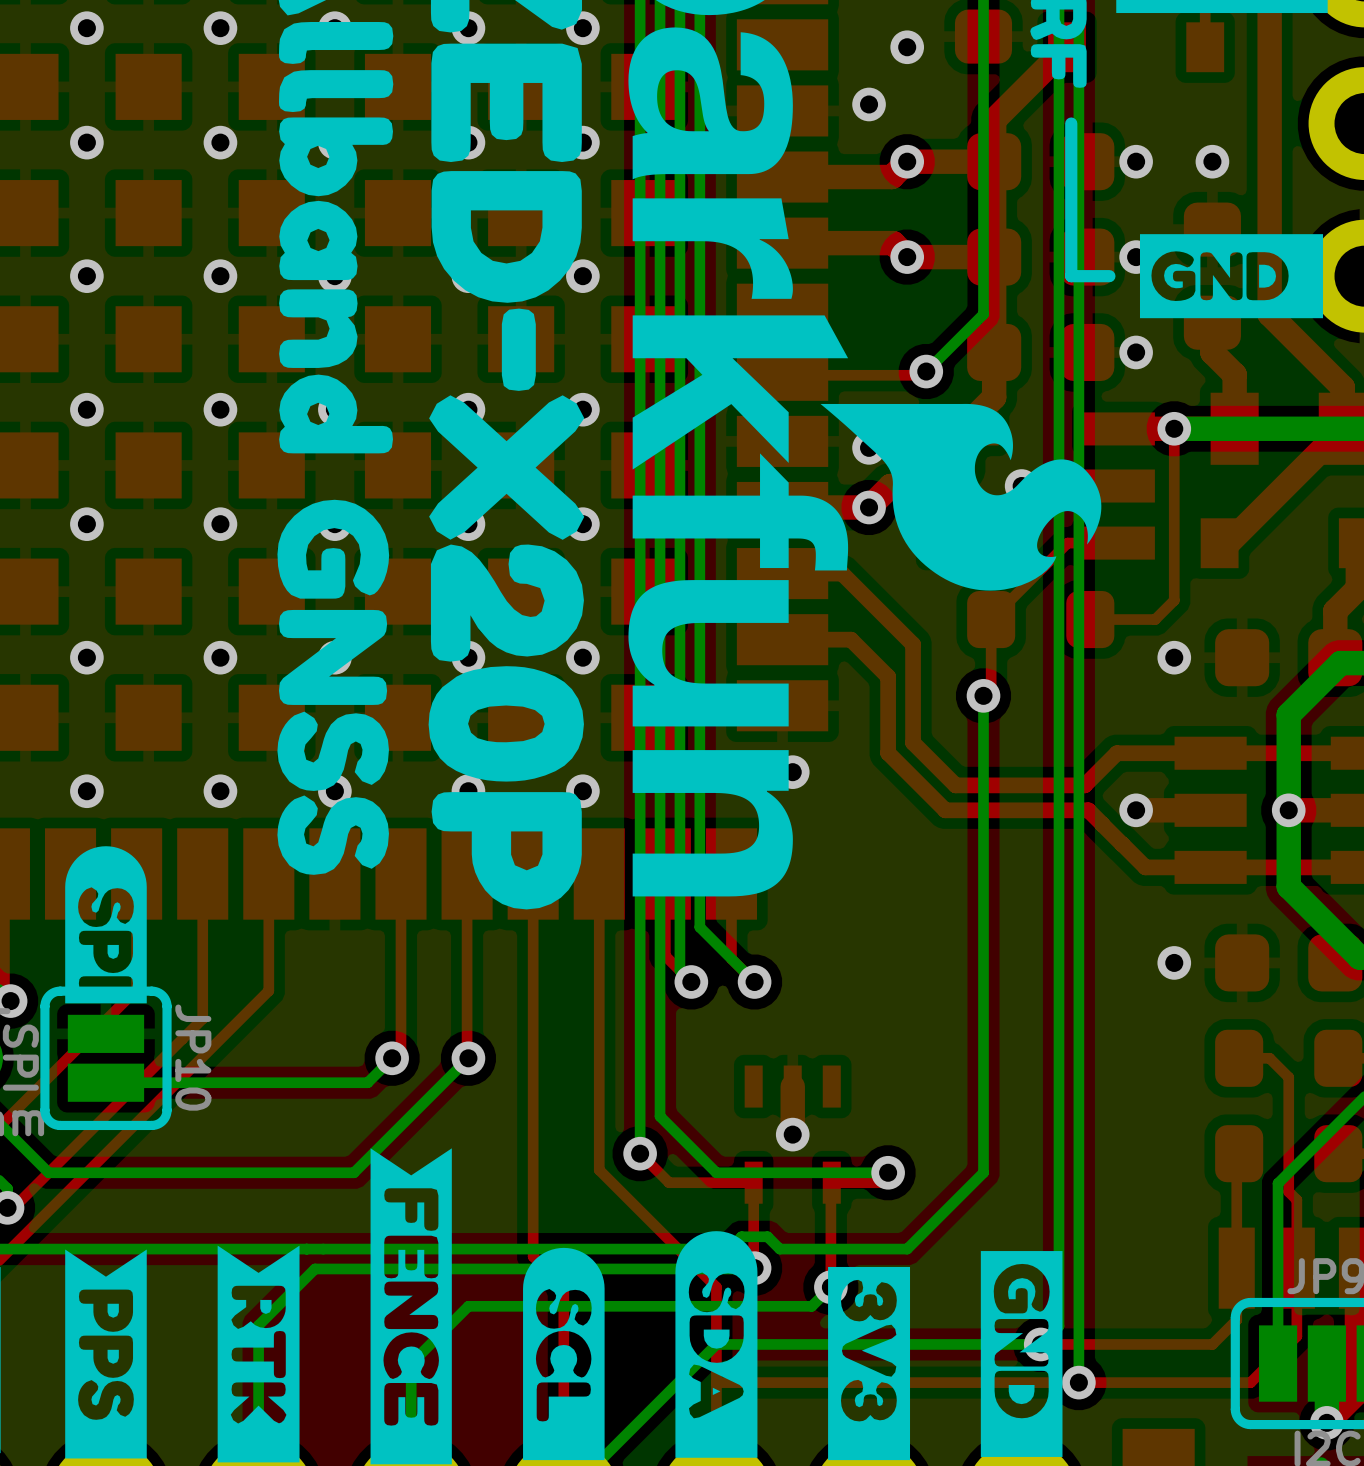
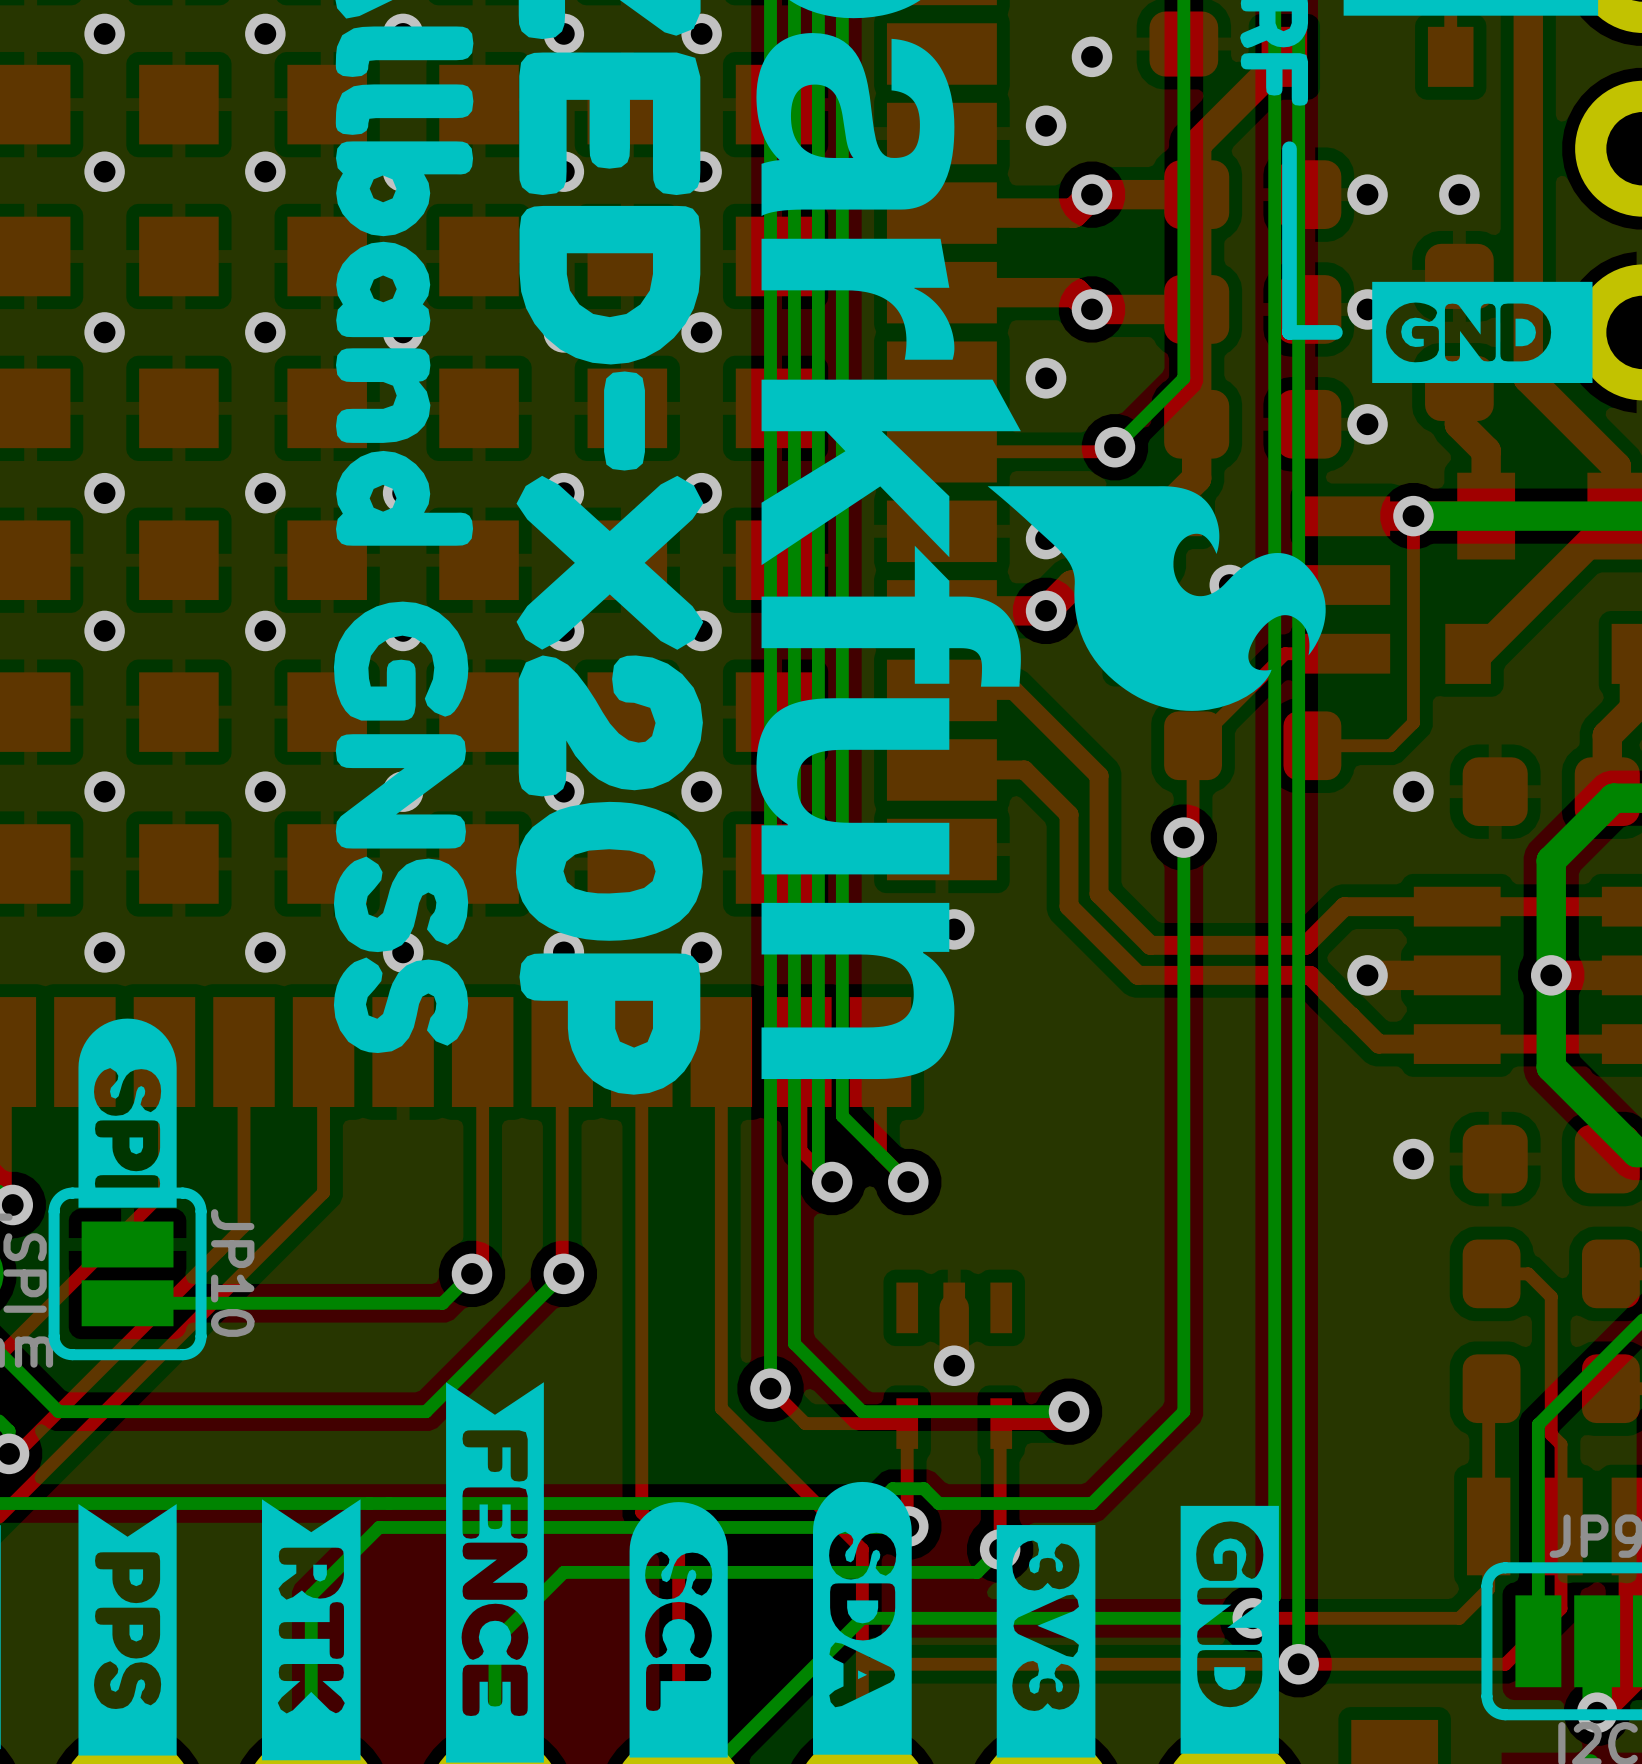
via: none -> (1046, 378)

